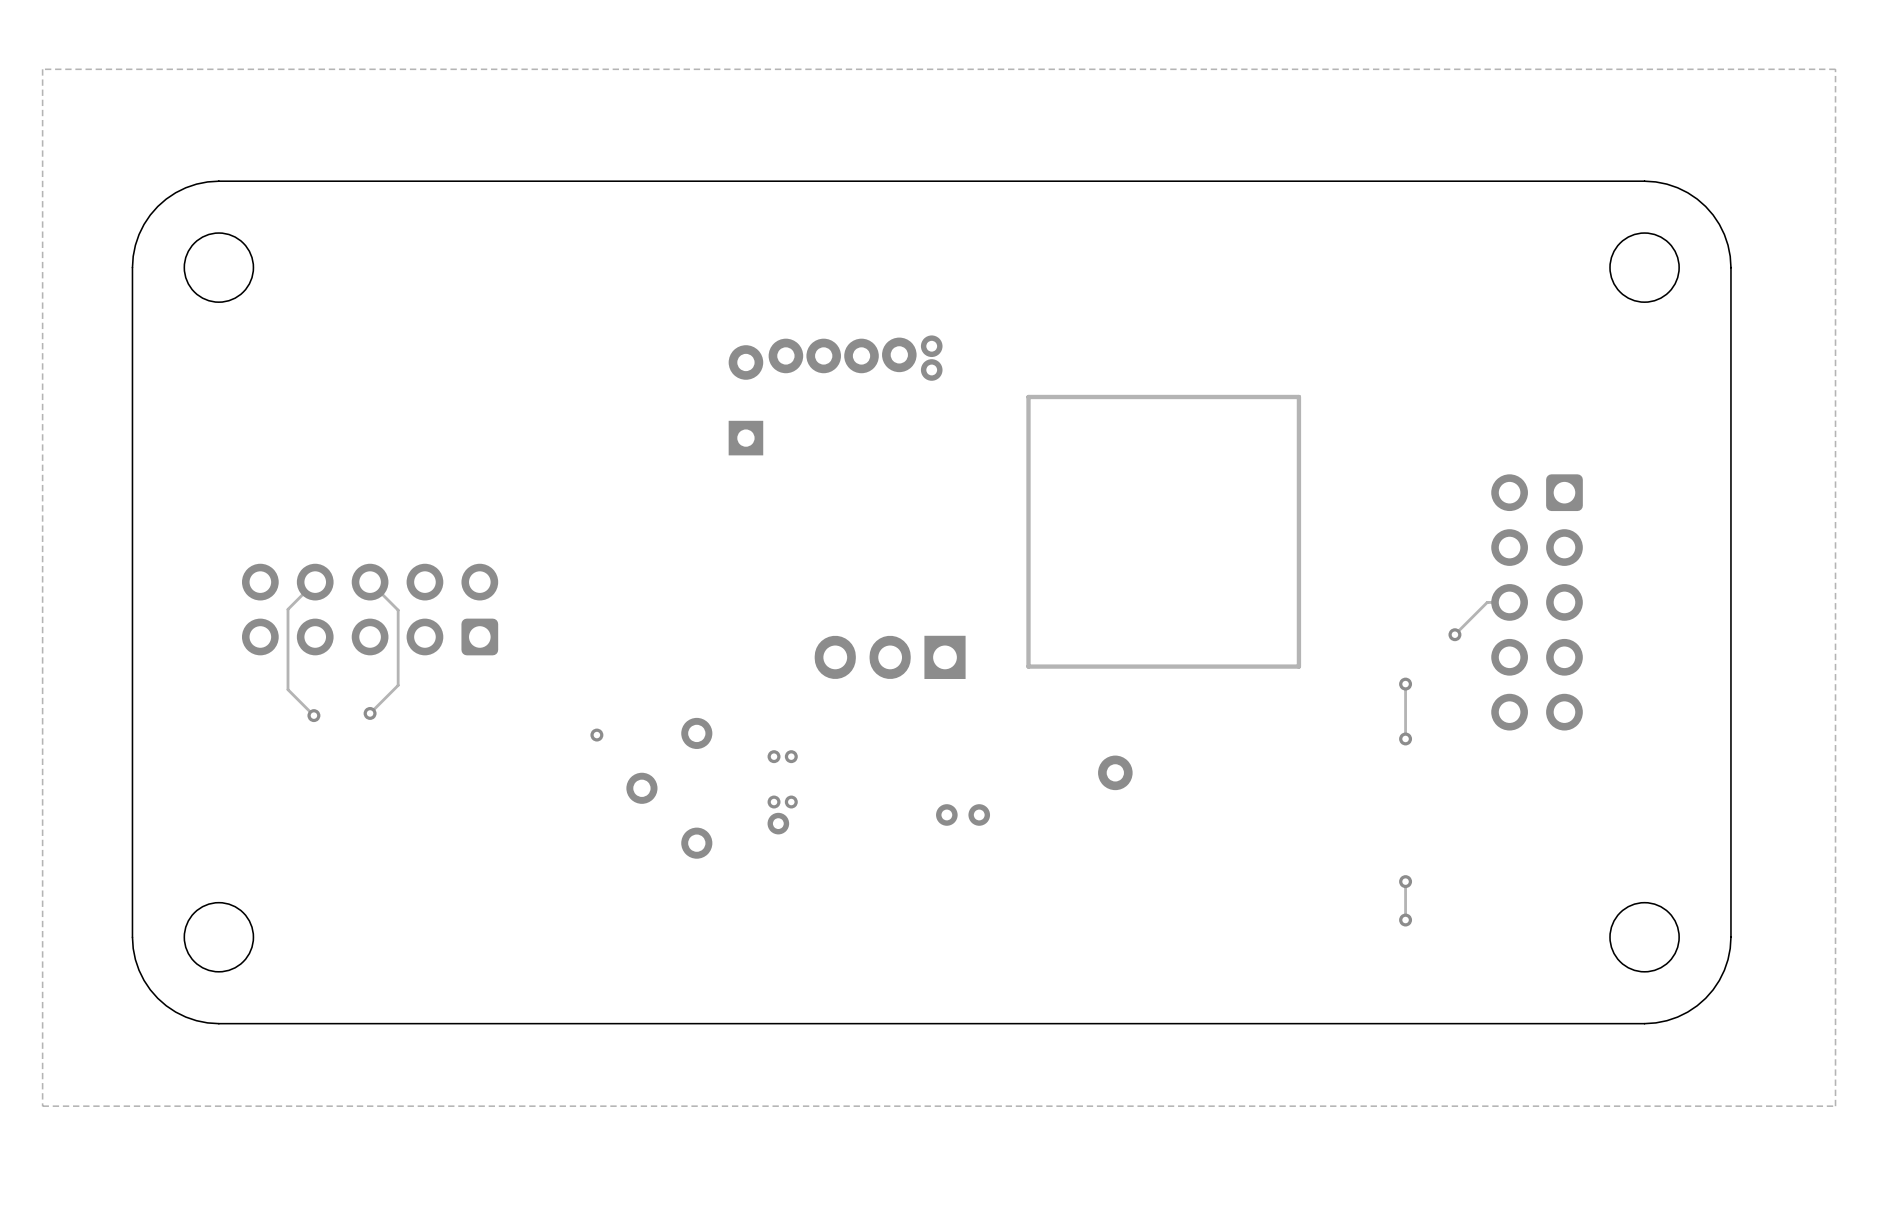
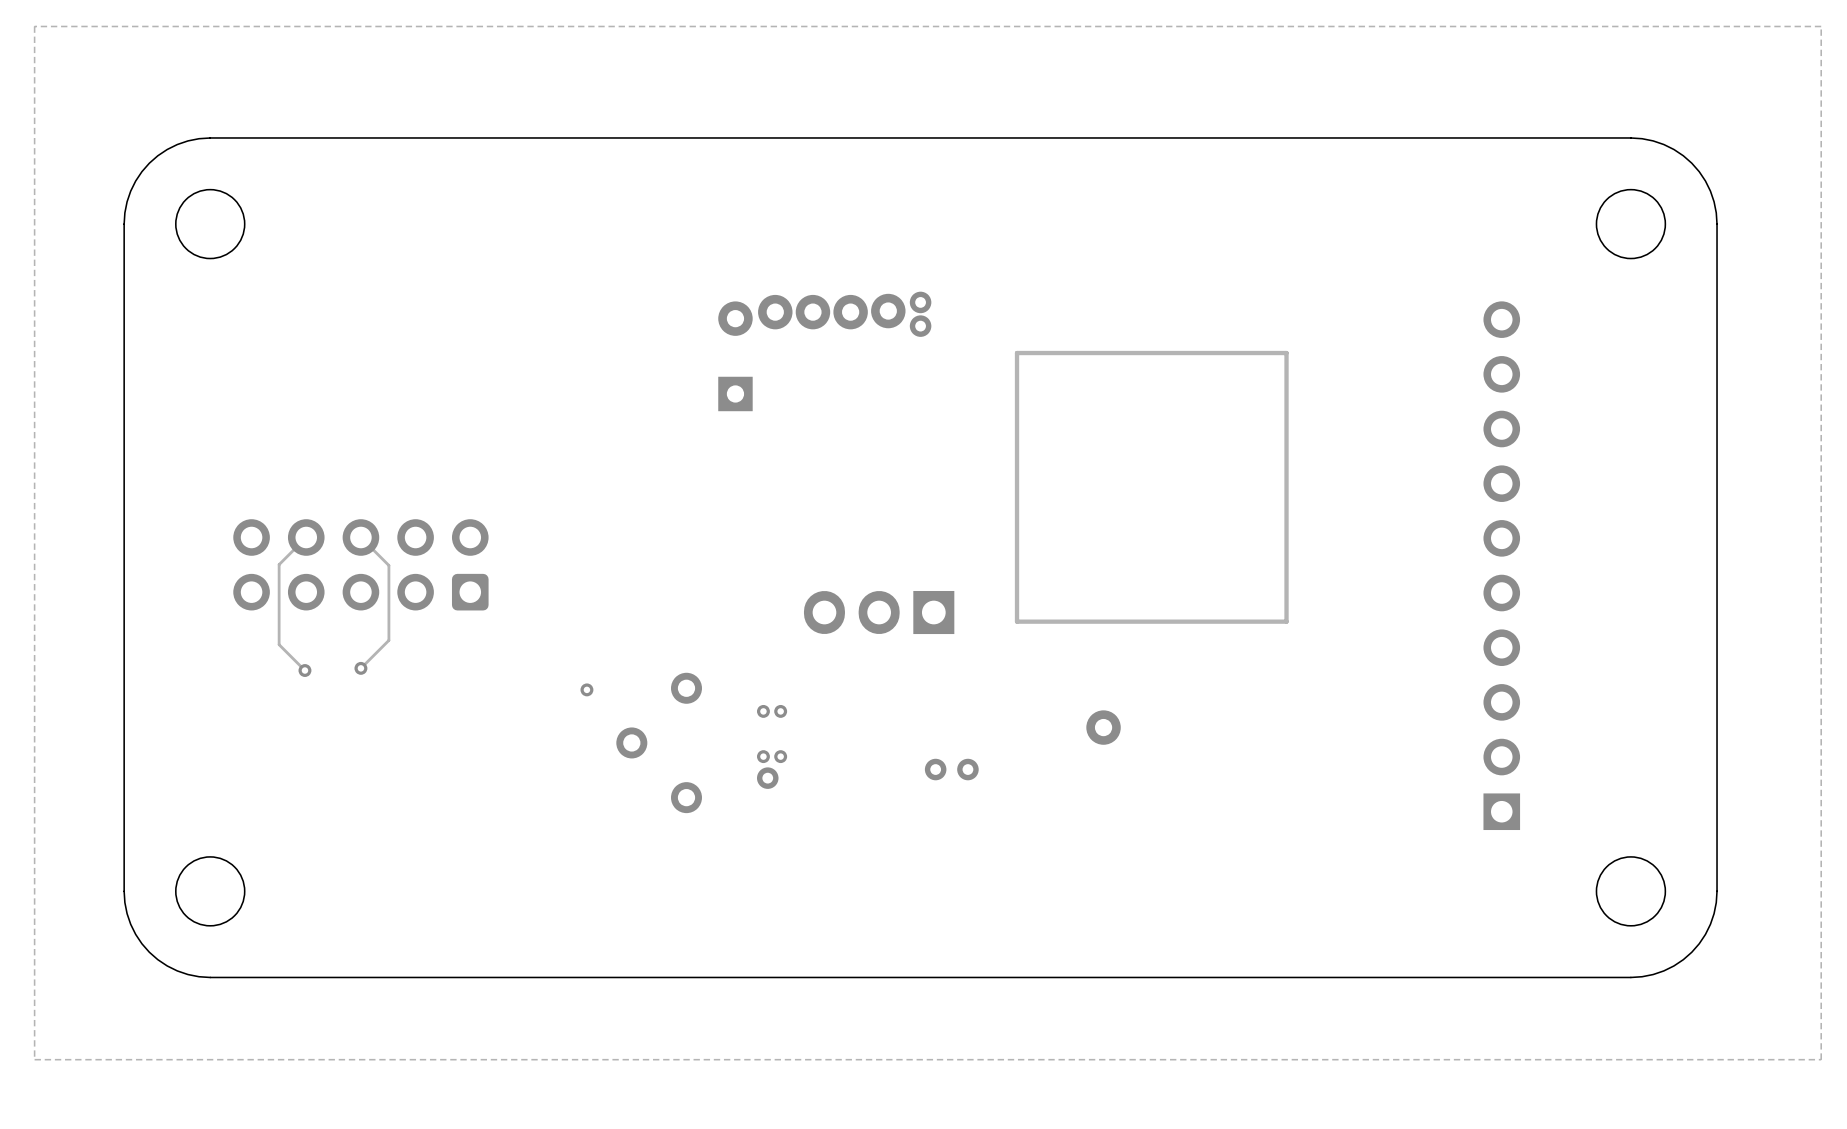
track: (1509, 602) (1487, 602) (1454, 634) -> none
part: (1537, 602) -> none
part: none -> (1501, 565)
via: (1454, 634) -> none
track: (1405, 684) (1405, 738) -> none
via: (1405, 684) -> none
via: (1405, 738) -> none
track: (1405, 881) (1405, 920) -> none
via: (1405, 881) -> none
via: (1405, 920) -> none

